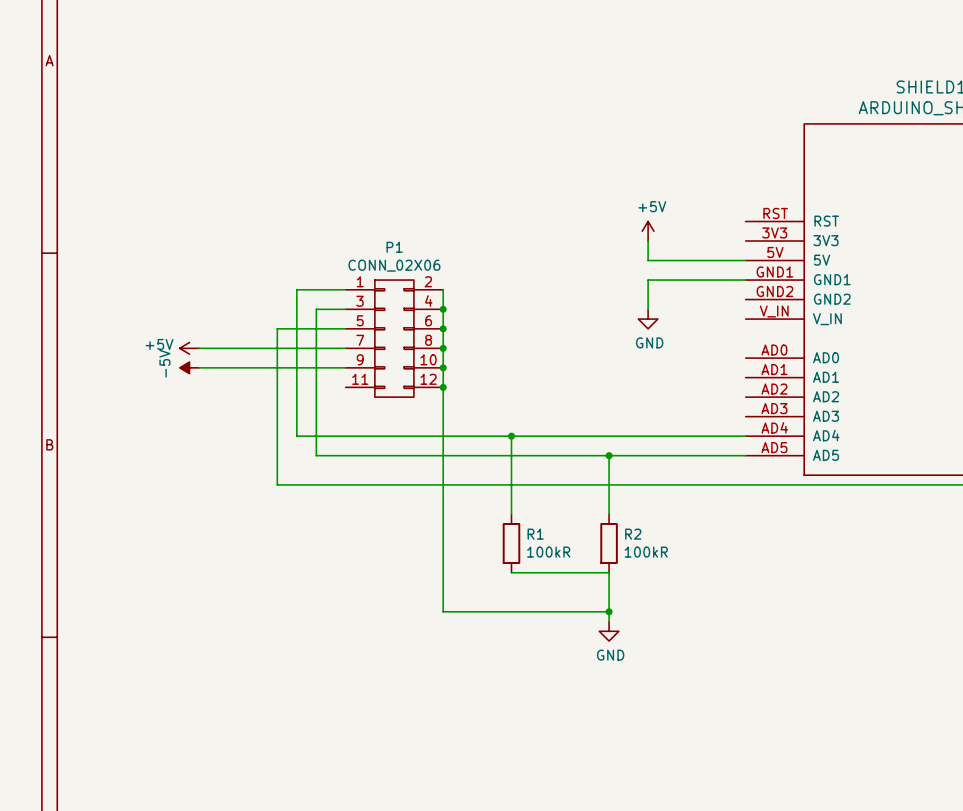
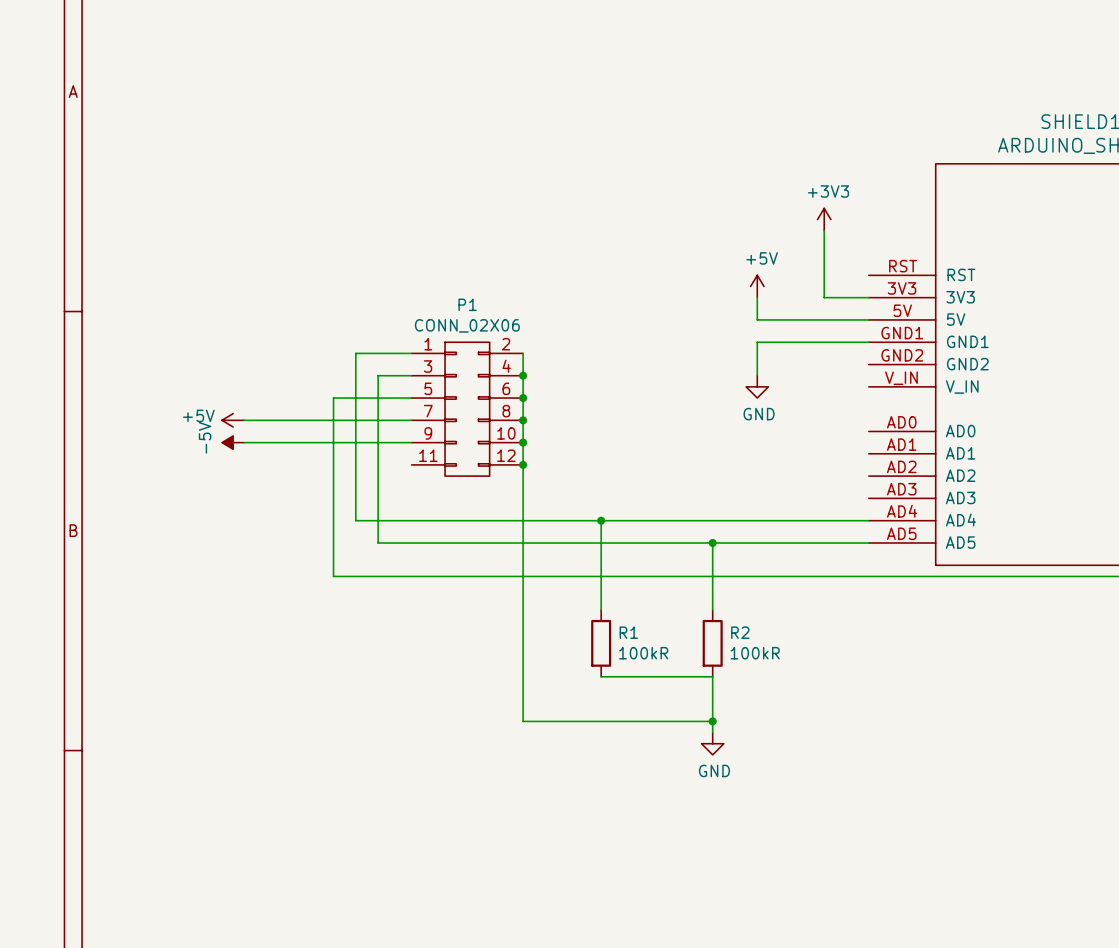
power symbol: none -> +3V3 (824, 219)
wire: none -> (824, 230) (824, 297) (868, 297)

